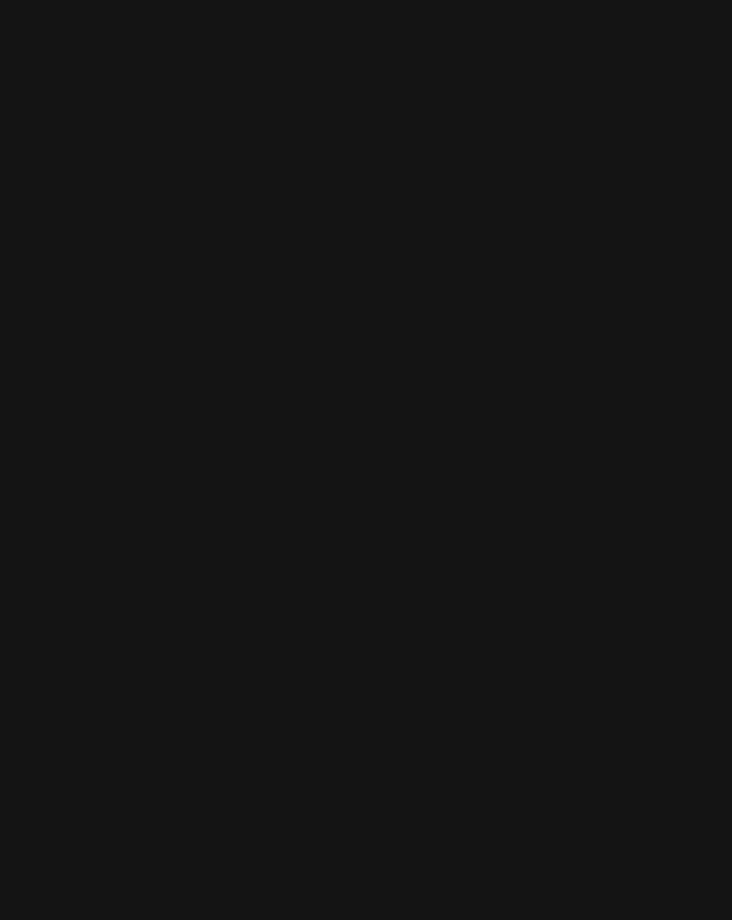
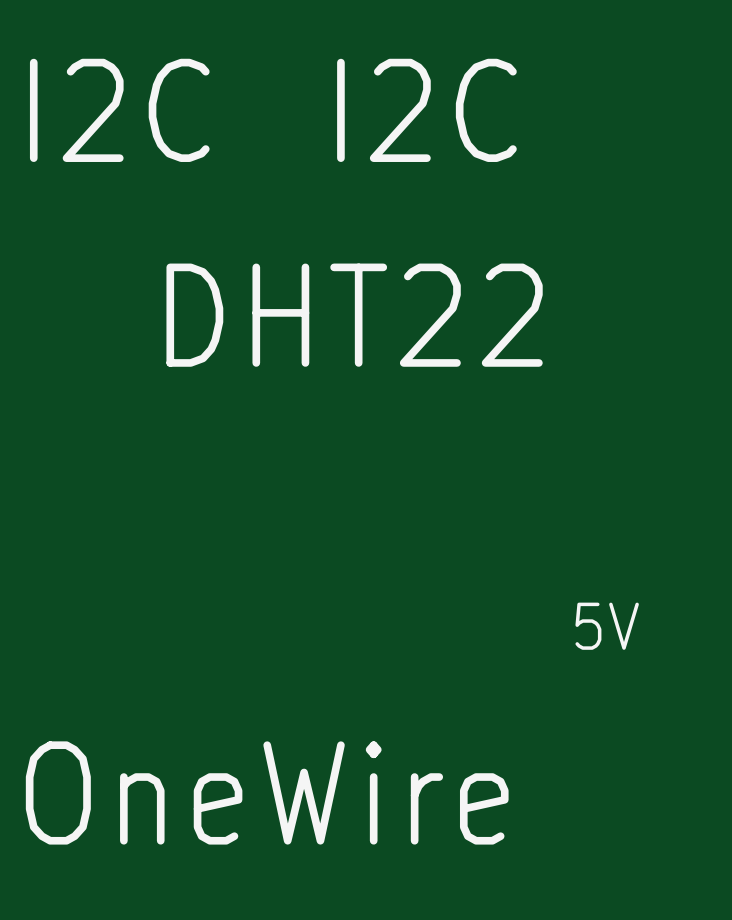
text: none -> I2C (119, 110)
text: none -> I2C (426, 110)
text: none -> DHT22 (354, 315)
text: none -> 5V (607, 626)
text: none -> OneWire (267, 792)

